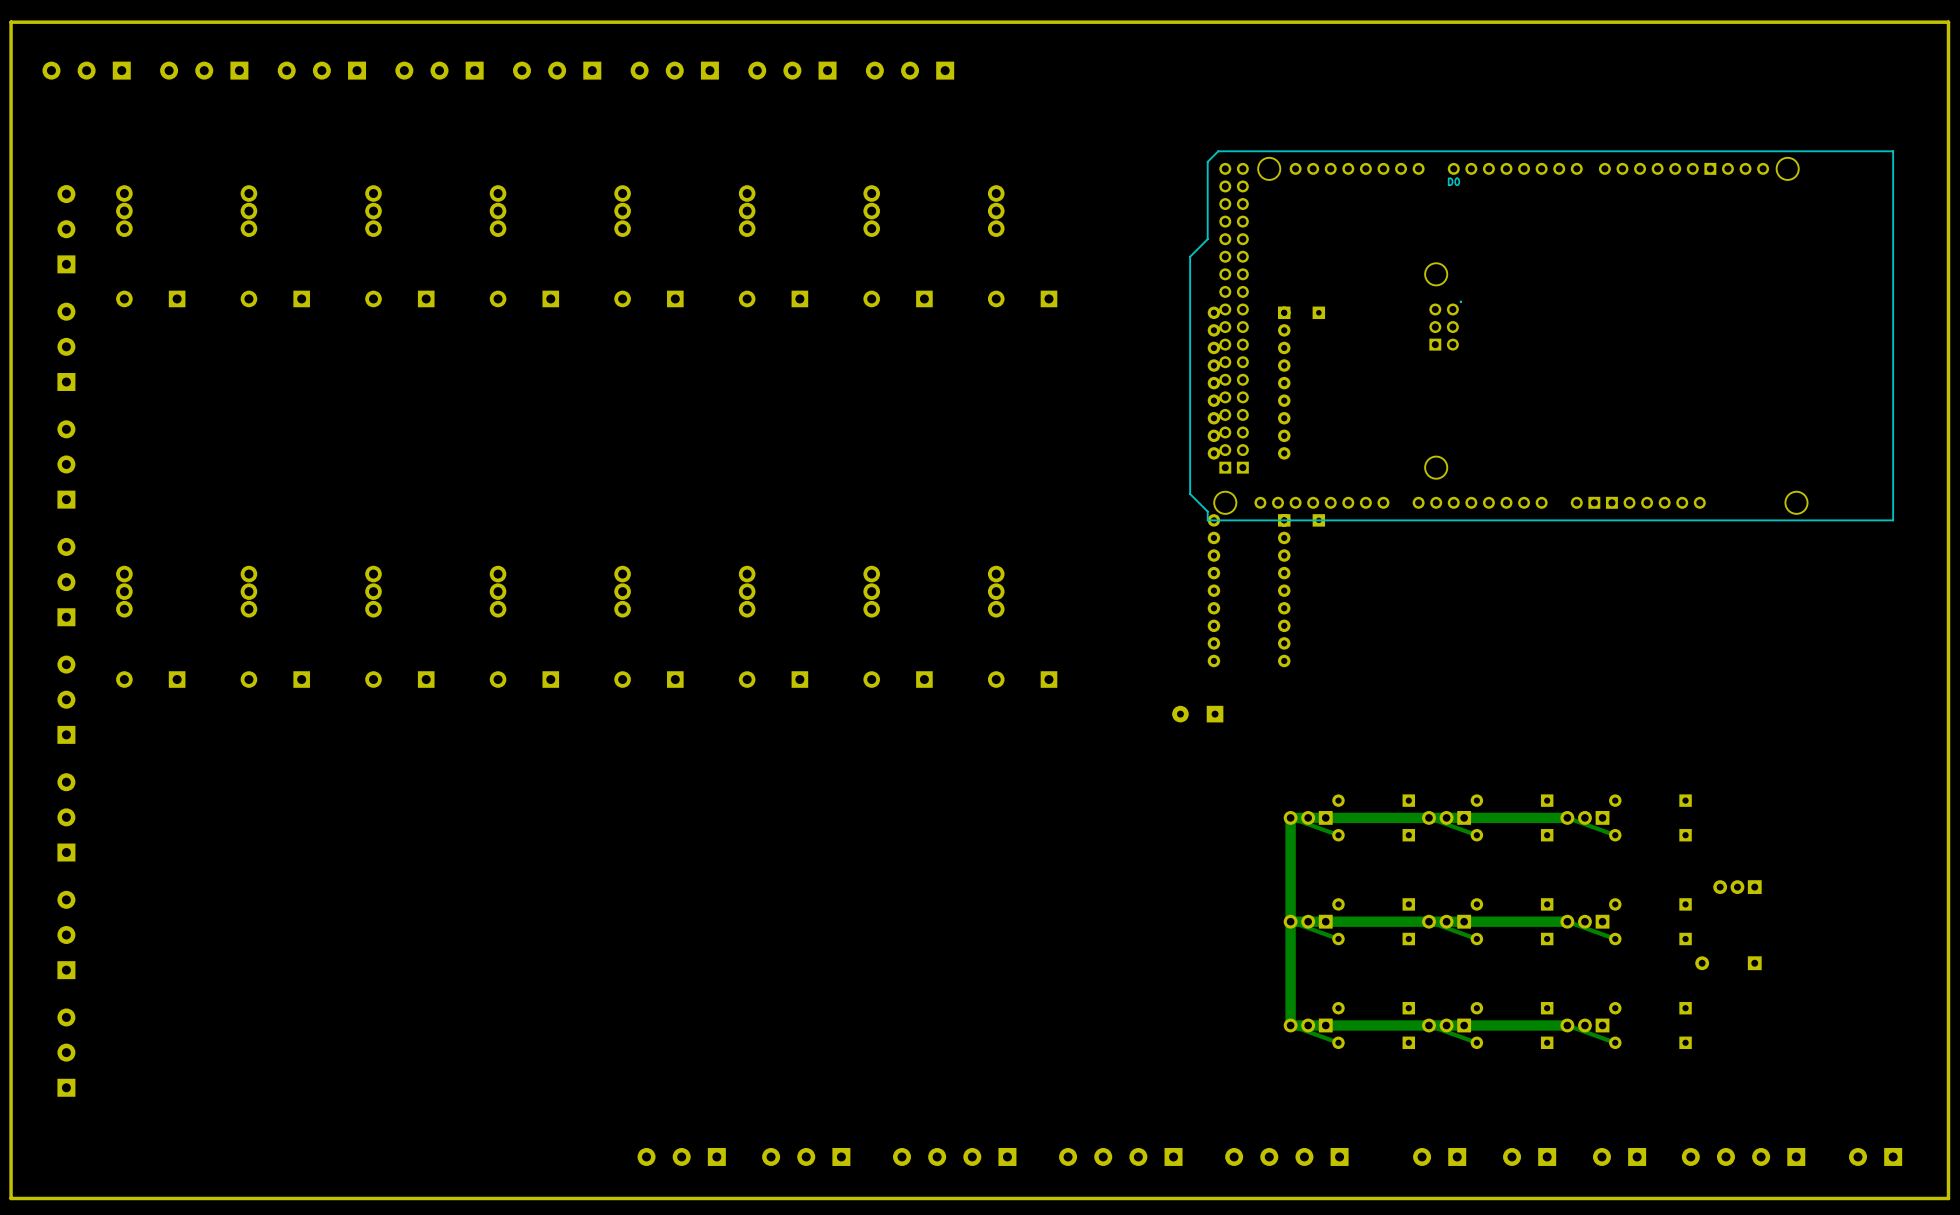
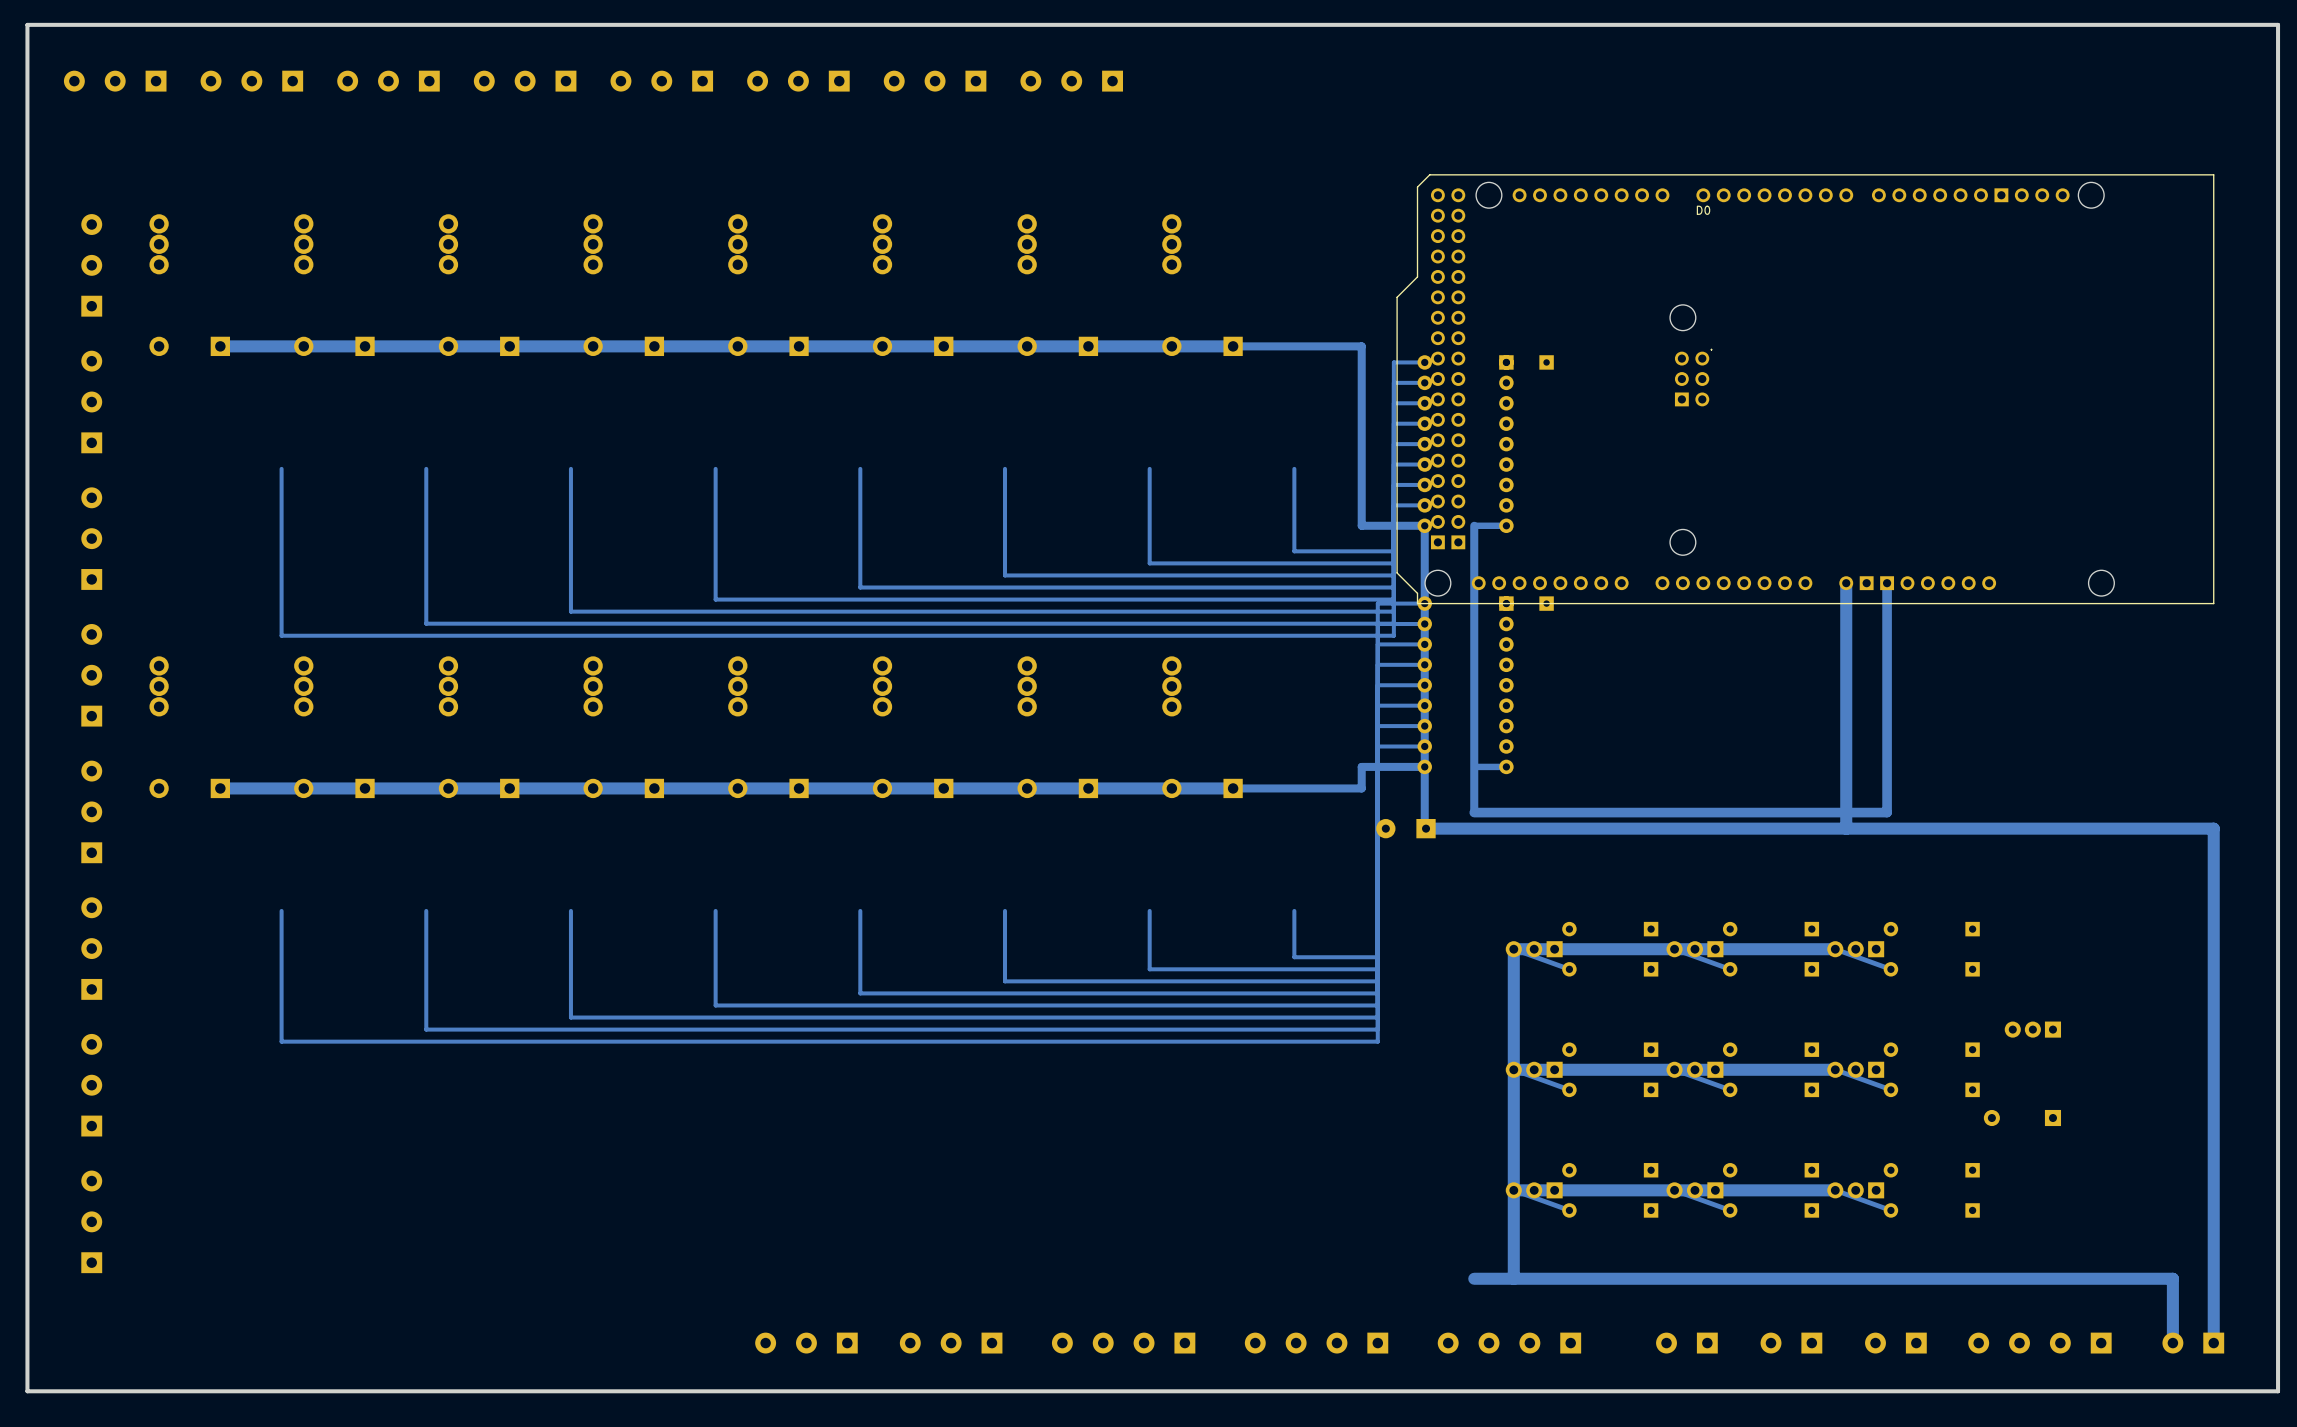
track: none -> (220, 346) (1361, 346) (1361, 525) (1424, 525) (1424, 828) (2213, 828) (2213, 1343)
track: none -> (1424, 362) (1393, 362) (1393, 635) (281, 635) (281, 468)
track: none -> (1424, 382) (1393, 382)
track: none -> (1424, 403) (1393, 403)
track: none -> (1424, 423) (1393, 423)
track: none -> (1424, 444) (1393, 444)
track: none -> (1424, 464) (1393, 464)
track: none -> (426, 468) (426, 623) (1393, 623)
track: none -> (570, 468) (570, 611) (1393, 611)
track: none -> (715, 468) (715, 599) (1393, 599)
track: none -> (860, 468) (860, 587) (1393, 587)
track: none -> (1005, 468) (1005, 575) (1393, 575)
track: none -> (1149, 468) (1149, 563) (1393, 563)
track: none -> (1294, 468) (1294, 551) (1393, 551)
track: none -> (1424, 484) (1393, 484)
track: none -> (1424, 505) (1393, 505)
track: none -> (1506, 525) (1474, 525) (1474, 812) (1887, 812) (1887, 583)
track: none -> (1846, 583) (1846, 828)
track: none -> (1424, 603) (1377, 603) (1377, 1041) (281, 1041) (281, 910)
track: none -> (1424, 624) (1377, 624)
track: none -> (1424, 644) (1377, 644)
track: none -> (1424, 664) (1377, 664)
track: none -> (1424, 685) (1377, 685)
track: none -> (1424, 705) (1377, 705)
track: none -> (1424, 726) (1377, 726)
track: none -> (1424, 746) (1377, 746)
track: none -> (1424, 766) (1361, 766) (1361, 788) (220, 788)
track: none -> (1506, 766) (1474, 766)
track: none -> (426, 910) (426, 1029) (1377, 1029)
track: none -> (570, 910) (570, 1017) (1377, 1017)
track: none -> (715, 910) (715, 1005) (1377, 1005)
track: none -> (860, 910) (860, 993) (1377, 993)
track: none -> (1005, 910) (1005, 981) (1377, 981)
track: none -> (1149, 910) (1149, 969) (1377, 969)
track: none -> (1294, 910) (1294, 957) (1377, 957)
track: none -> (1513, 1190) (1513, 1278)
track: none -> (1474, 1278) (2172, 1278) (2172, 1343)

